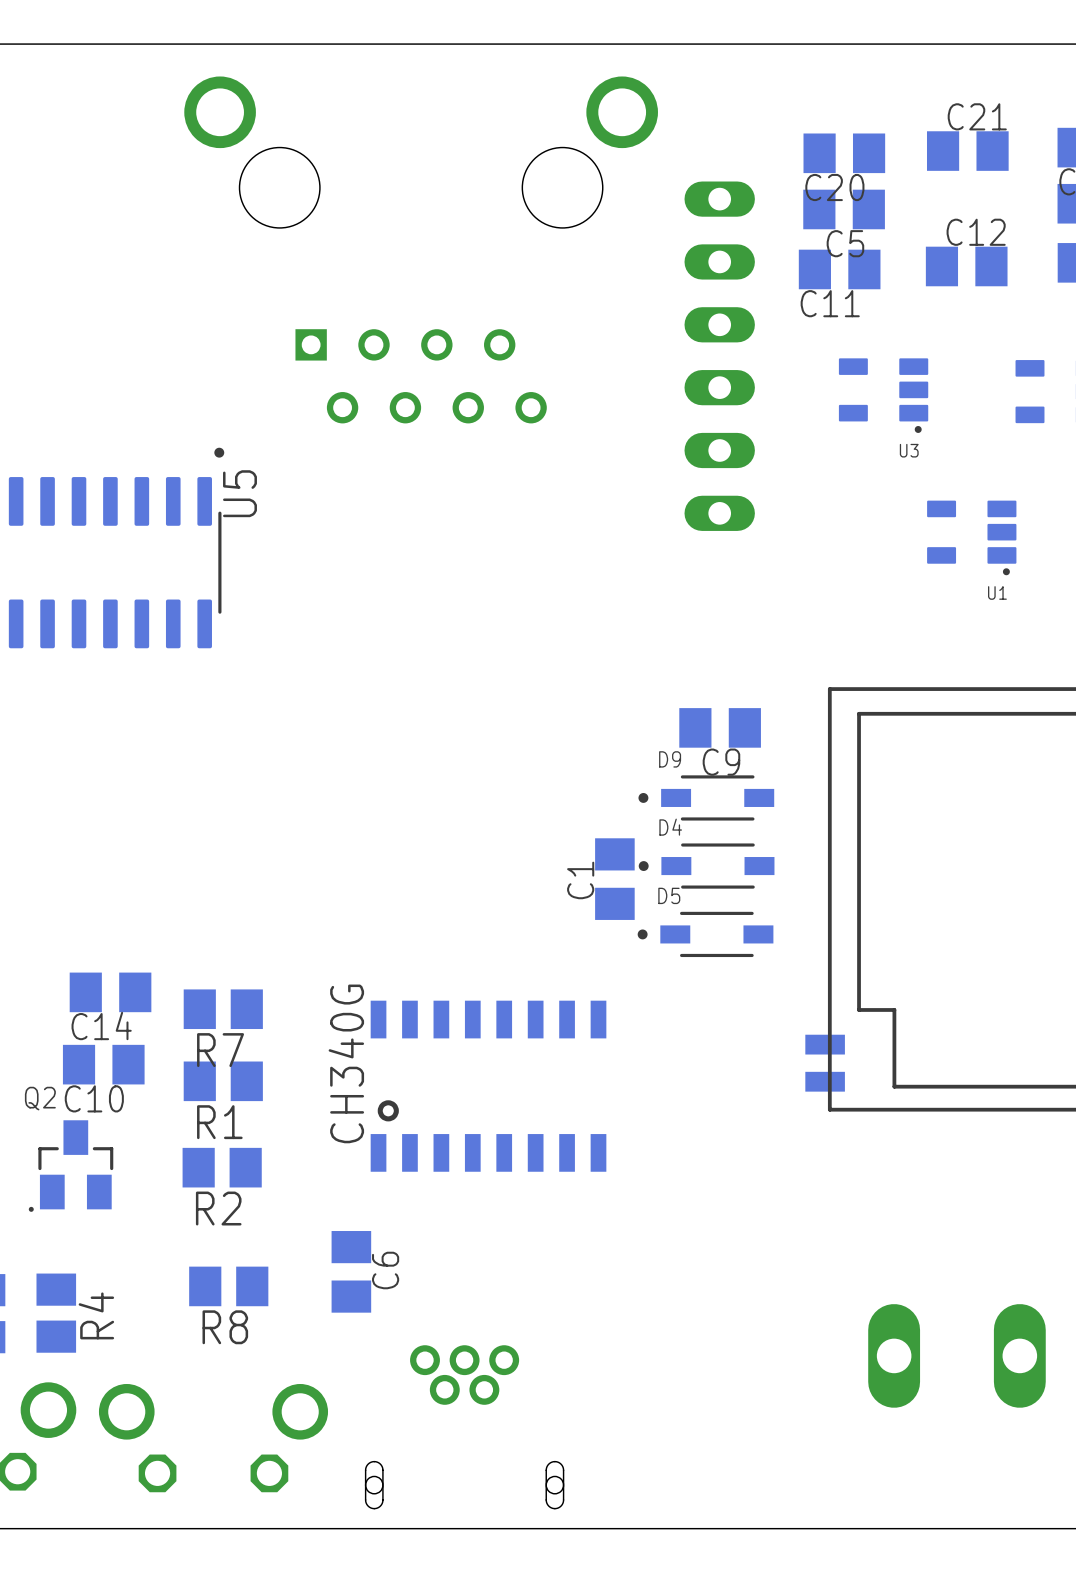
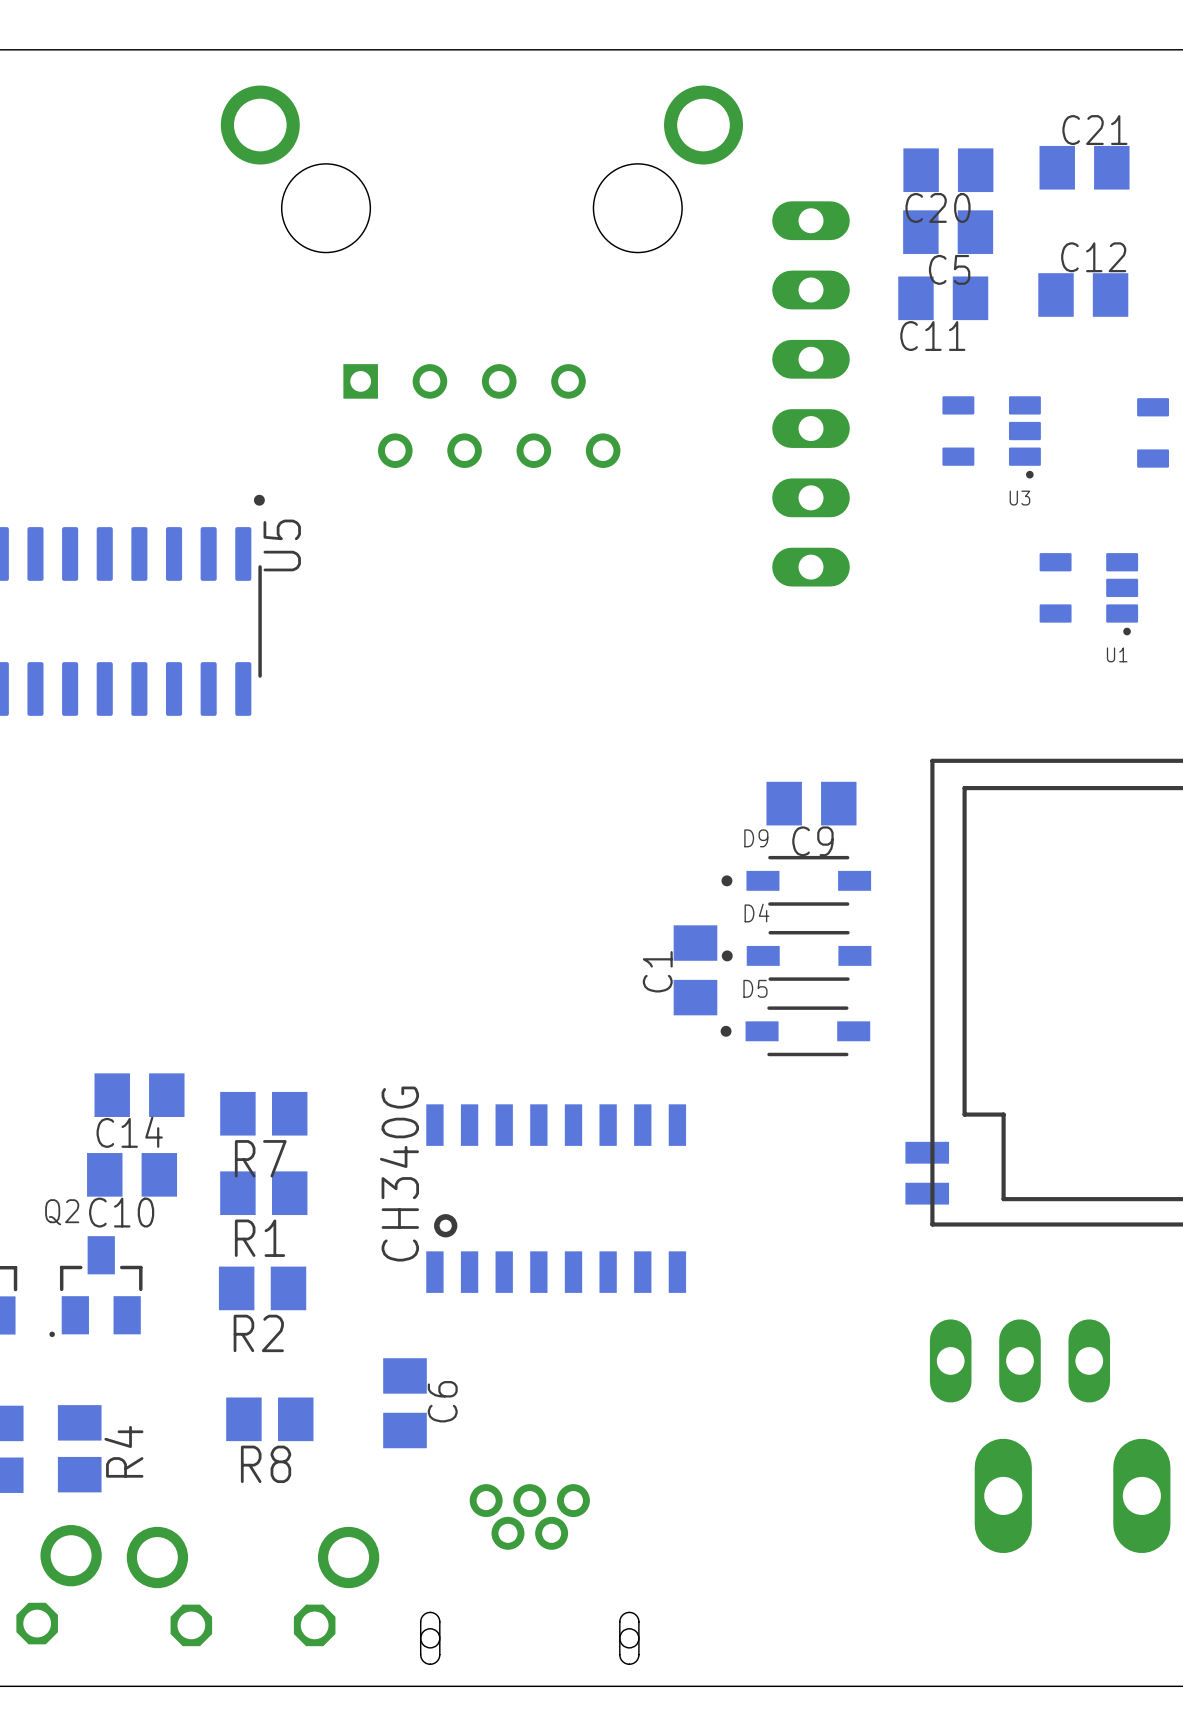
part: none -> (1019, 1360)

